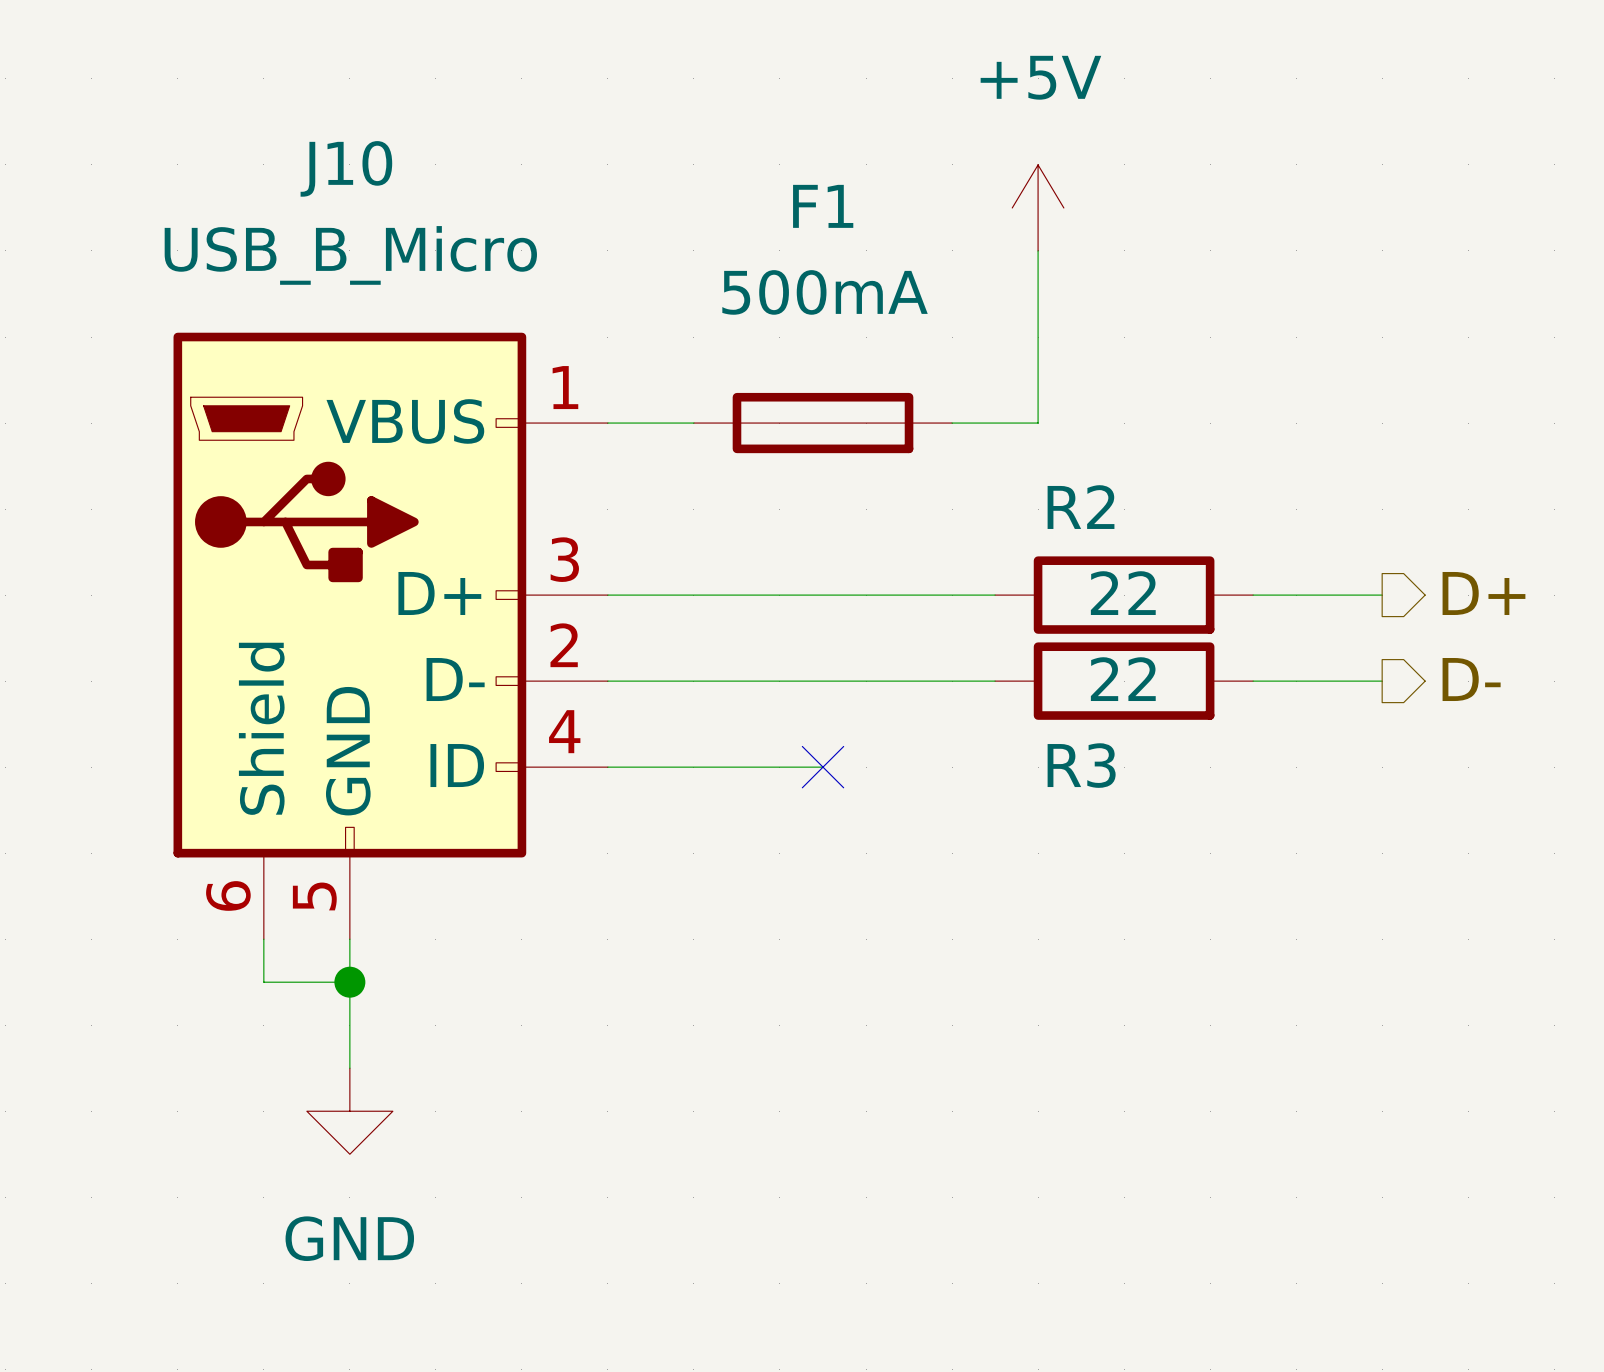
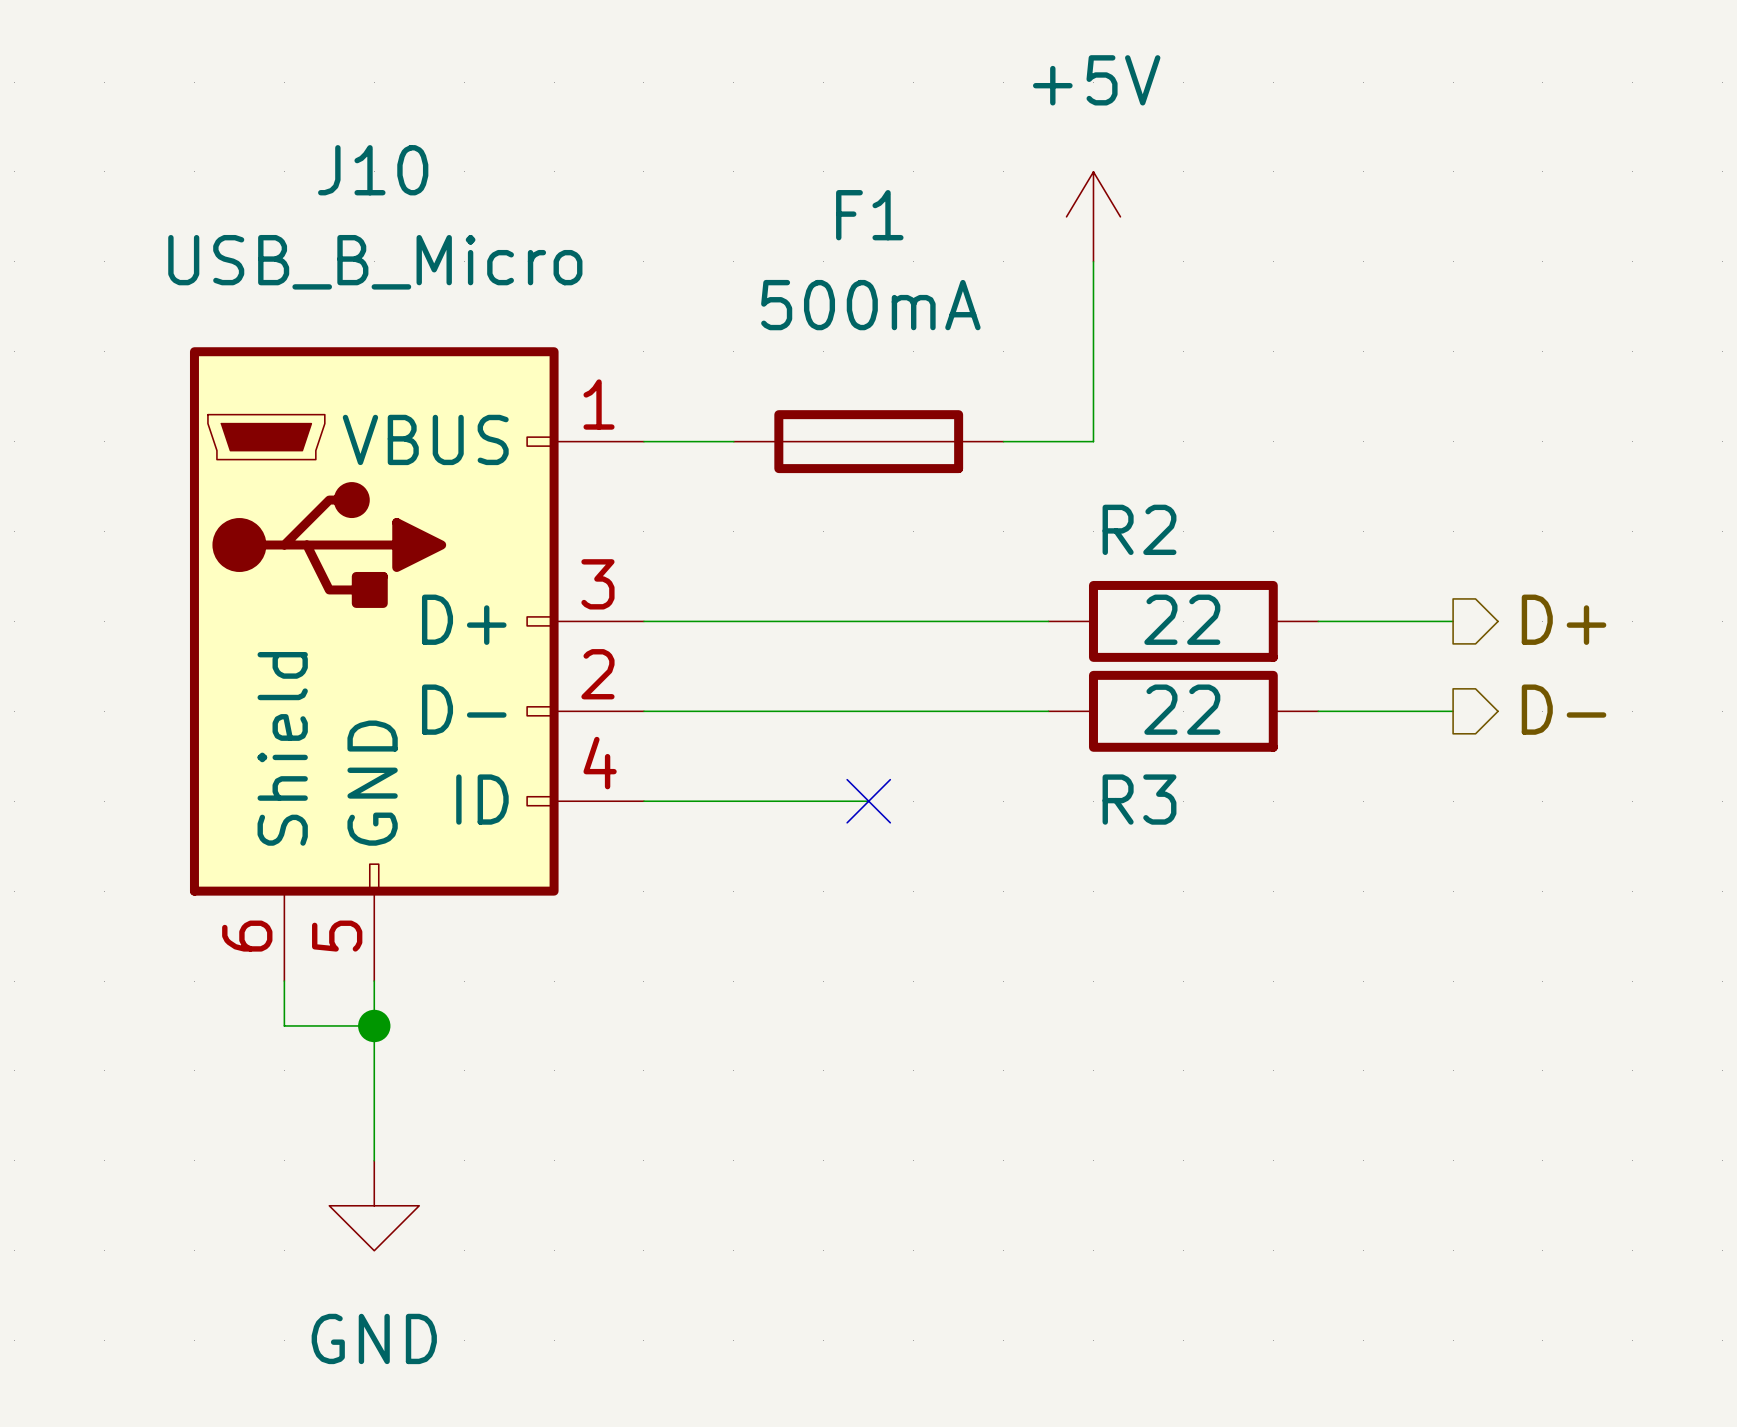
power symbol position: GND (349, 1111) -> GND (374, 1205)

